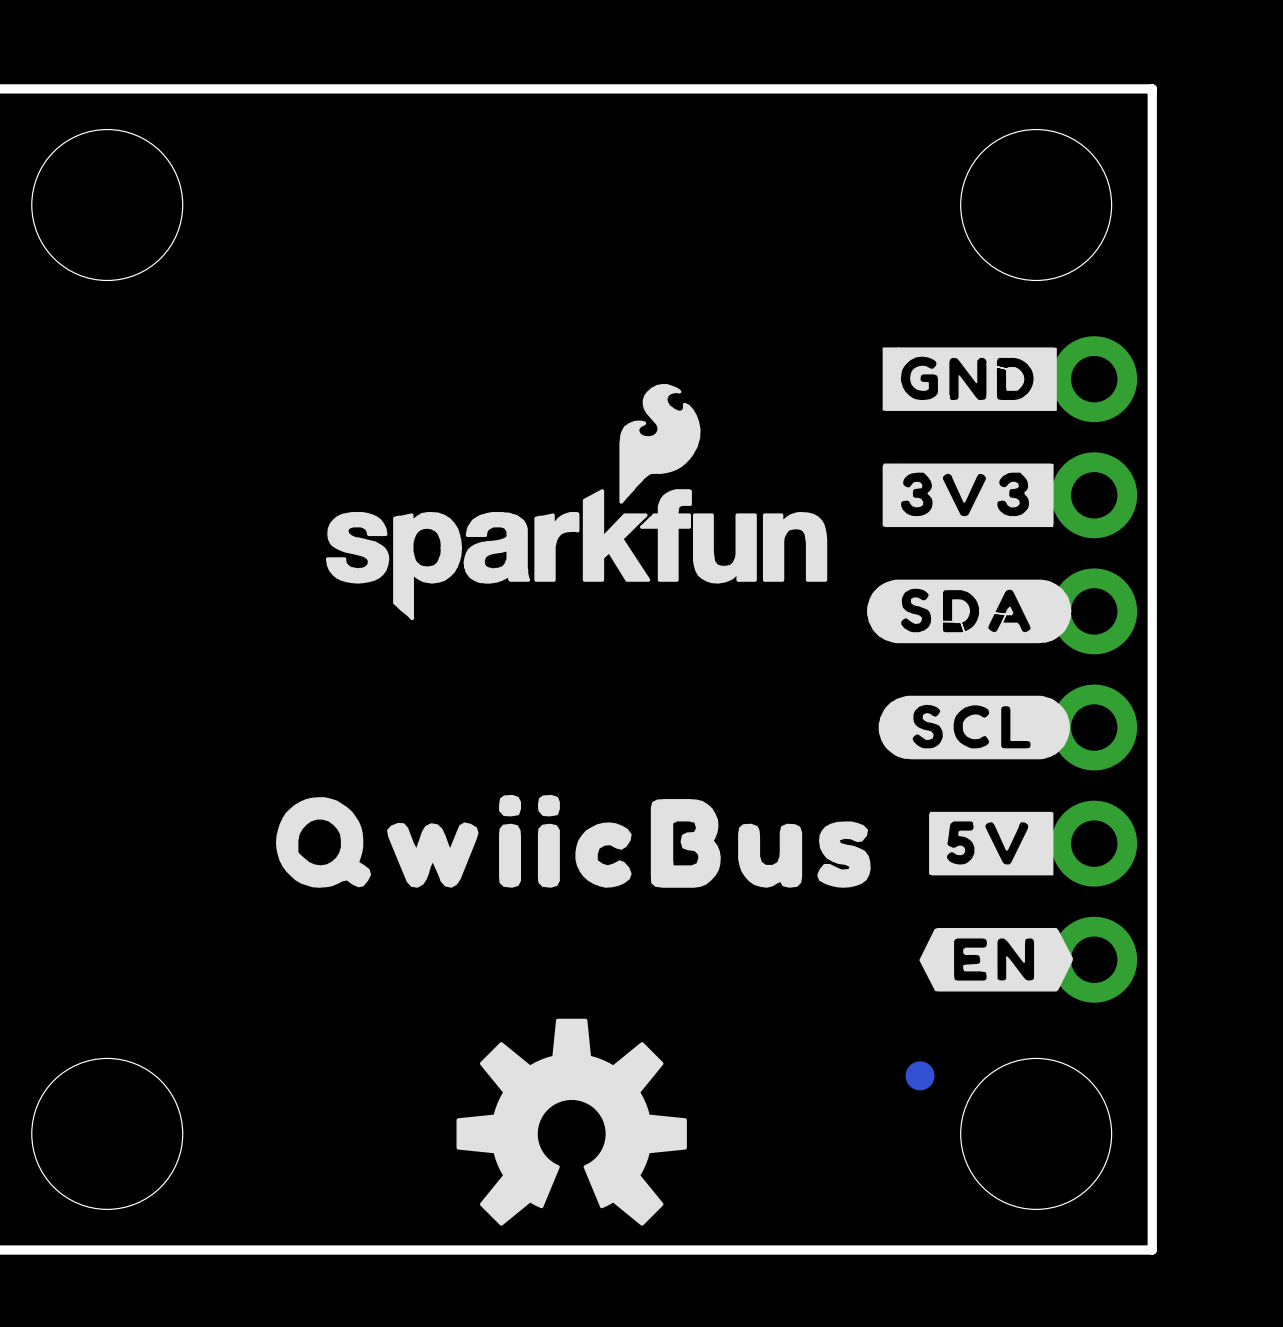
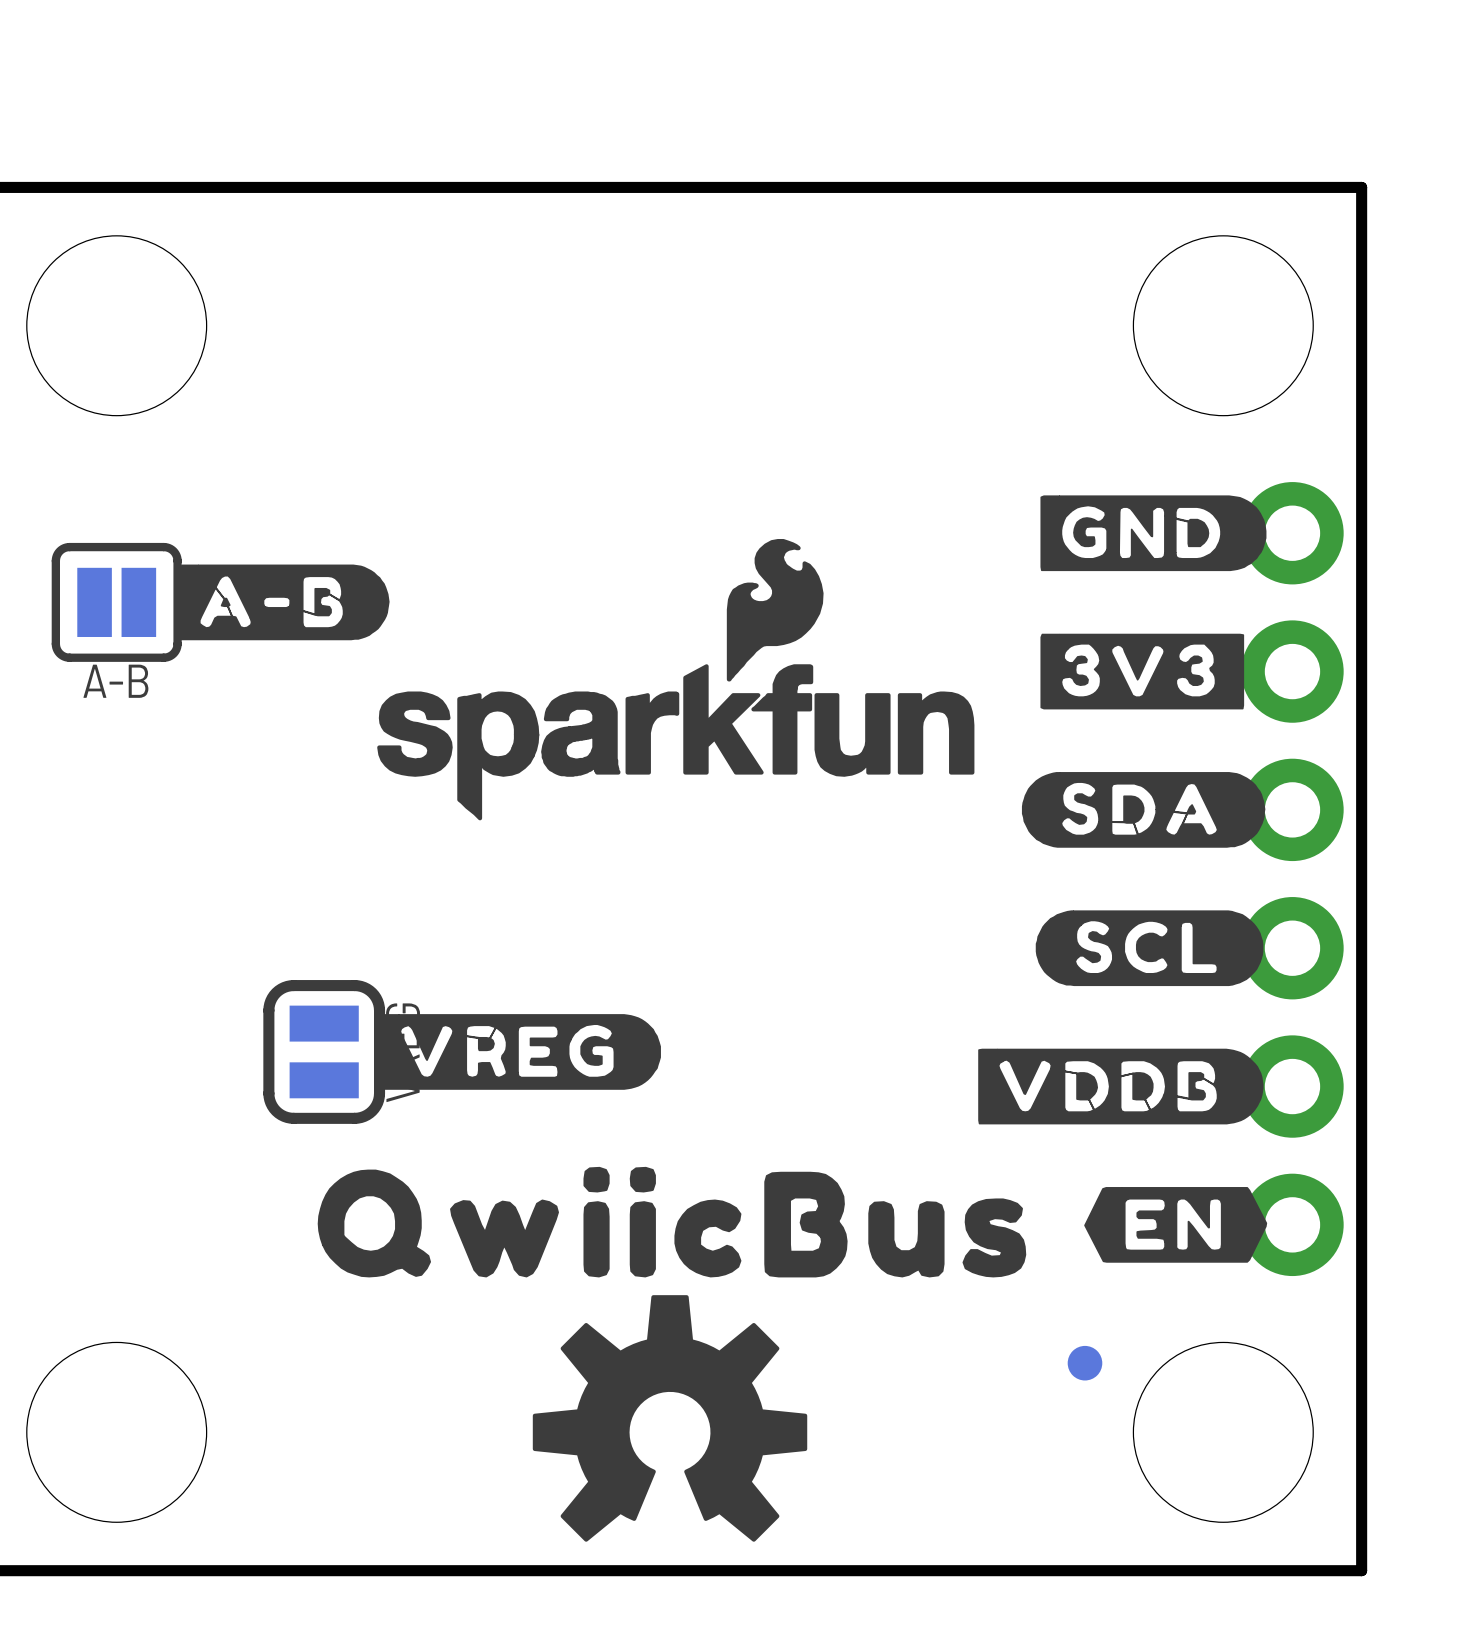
drawing shape: [882, 347, 1057, 411] -> [1040, 495, 1267, 572]
drawing: none -> [179, 564, 390, 641]
A-B: none -> (116, 602)
drawing: none -> [379, 1014, 661, 1090]
drawing shape: [929, 811, 1054, 876] -> [978, 1048, 1264, 1125]
part: none -> (324, 1051)
drawing position: (573, 841) -> (671, 1222)

